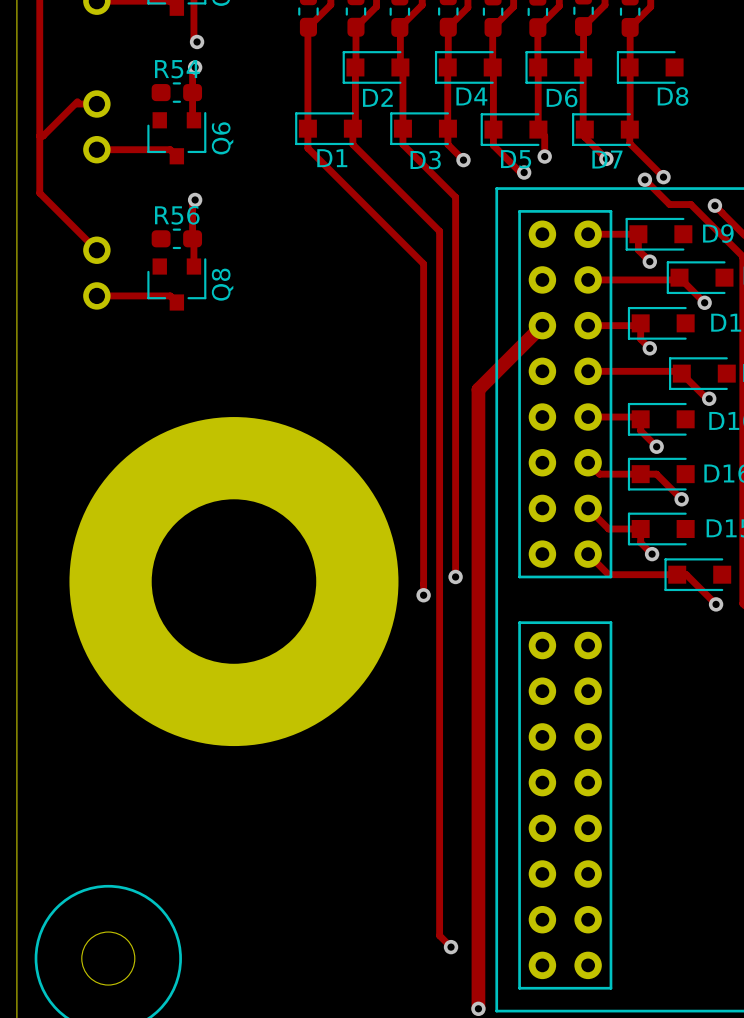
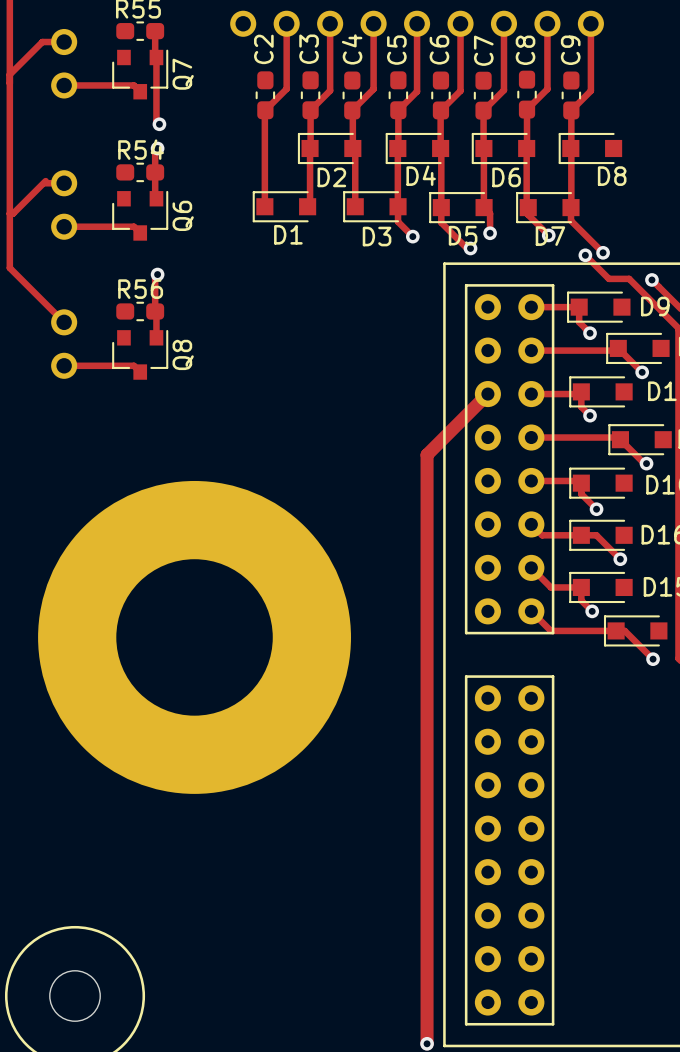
track: (307, 128) (307, 148) (423, 263) (423, 595) -> none
track: (352, 128) (352, 144) (439, 231) (439, 935) (451, 947) -> none
track: (402, 128) (402, 144) (455, 197) (455, 576) -> none
via: (455, 576) -> none
via: (423, 595) -> none
via: (451, 947) -> none

